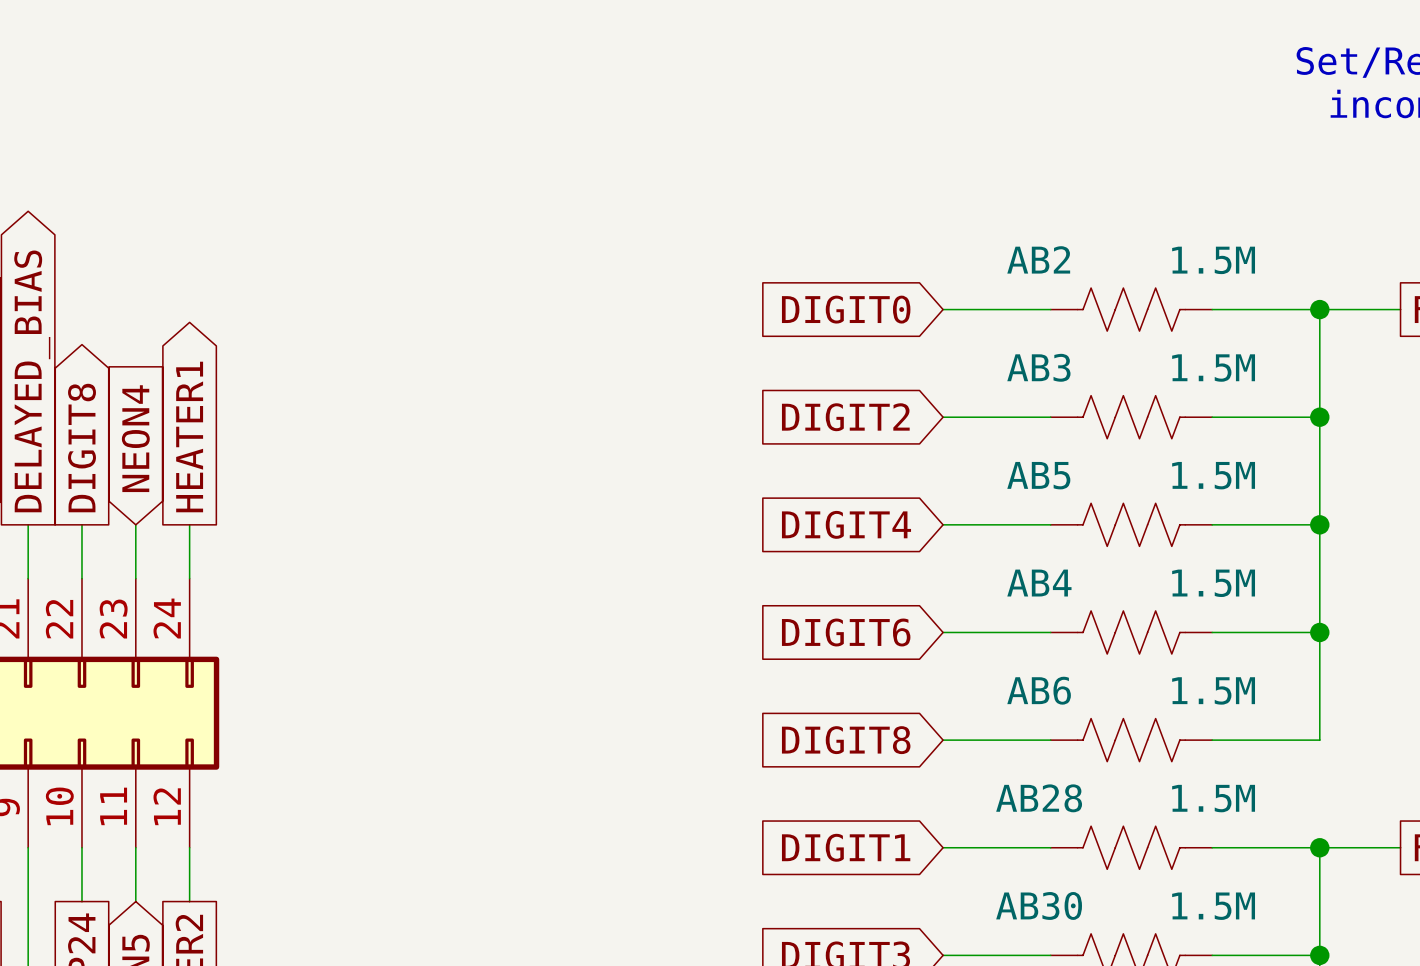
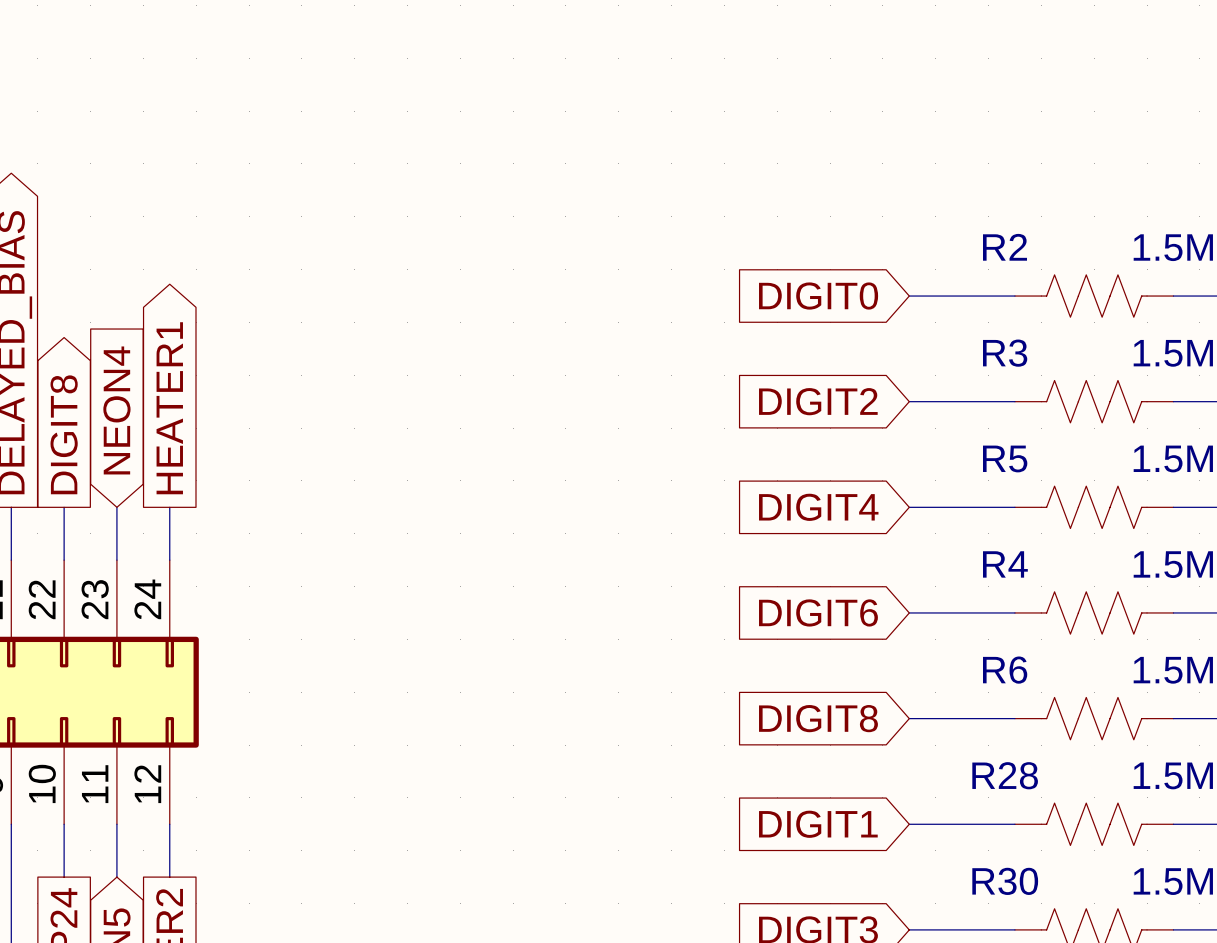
AB2 name: AB2 (1038, 259) -> R2 (1005, 247)
AB3 name: AB3 (1038, 367) -> R3 (1005, 353)
AB5 name: AB5 (1038, 475) -> R5 (1005, 458)
AB4 name: AB4 (1039, 583) -> R4 (1005, 564)
AB6 name: AB6 (1039, 690) -> R6 (1005, 670)
AB28 name: AB28 (1039, 798) -> R28 (1005, 775)
AB30 name: AB30 (1039, 905) -> R30 (1005, 881)

